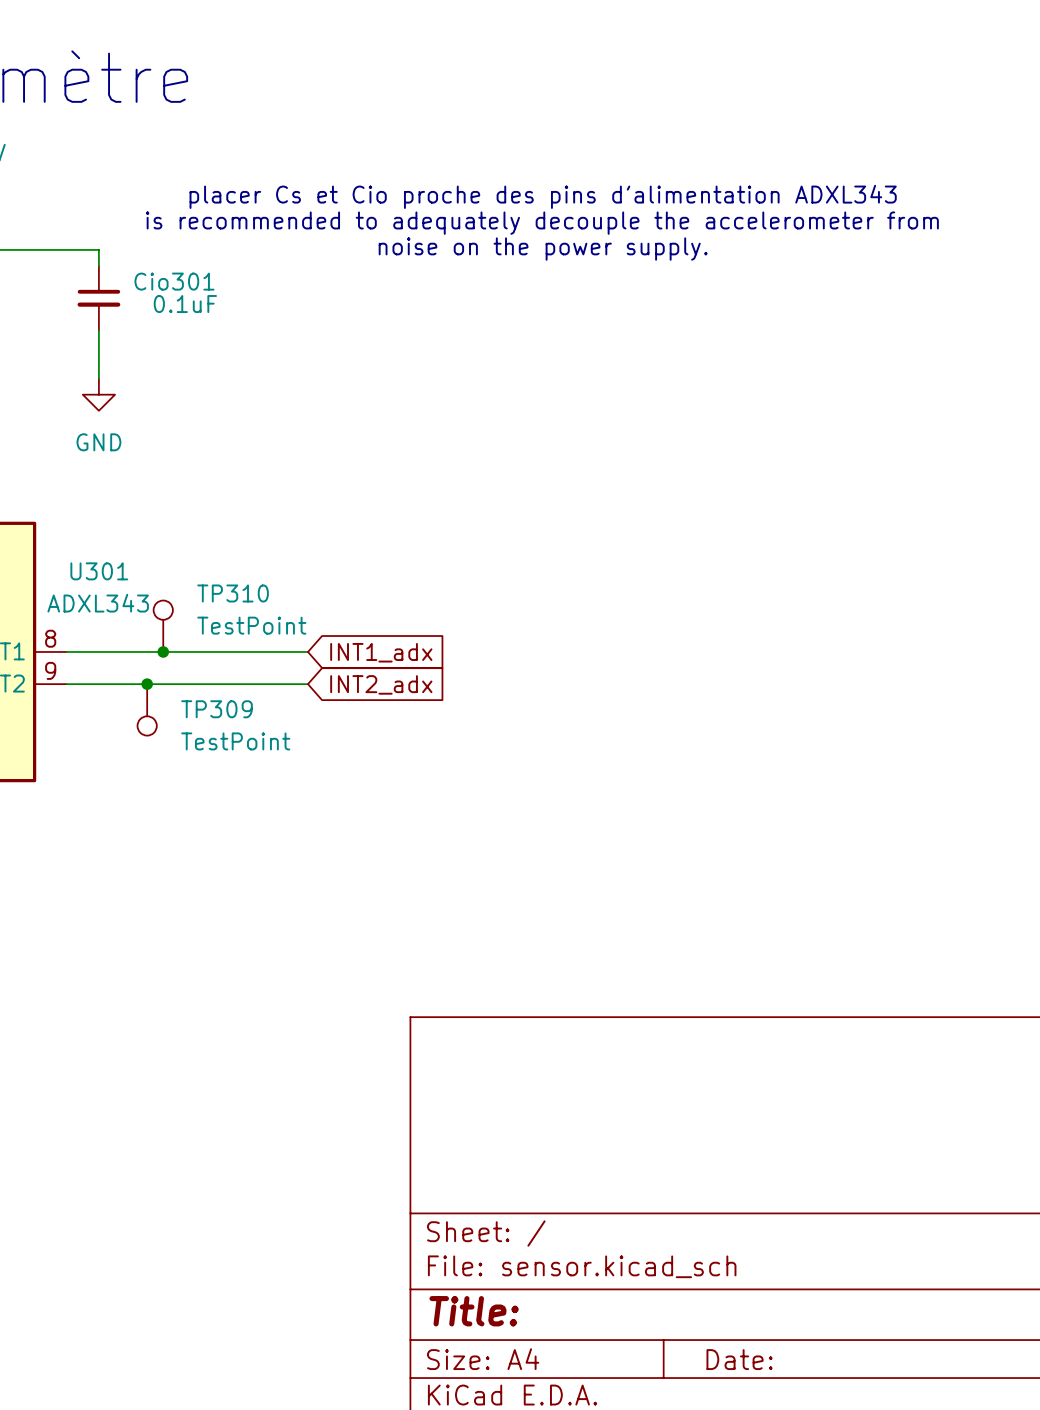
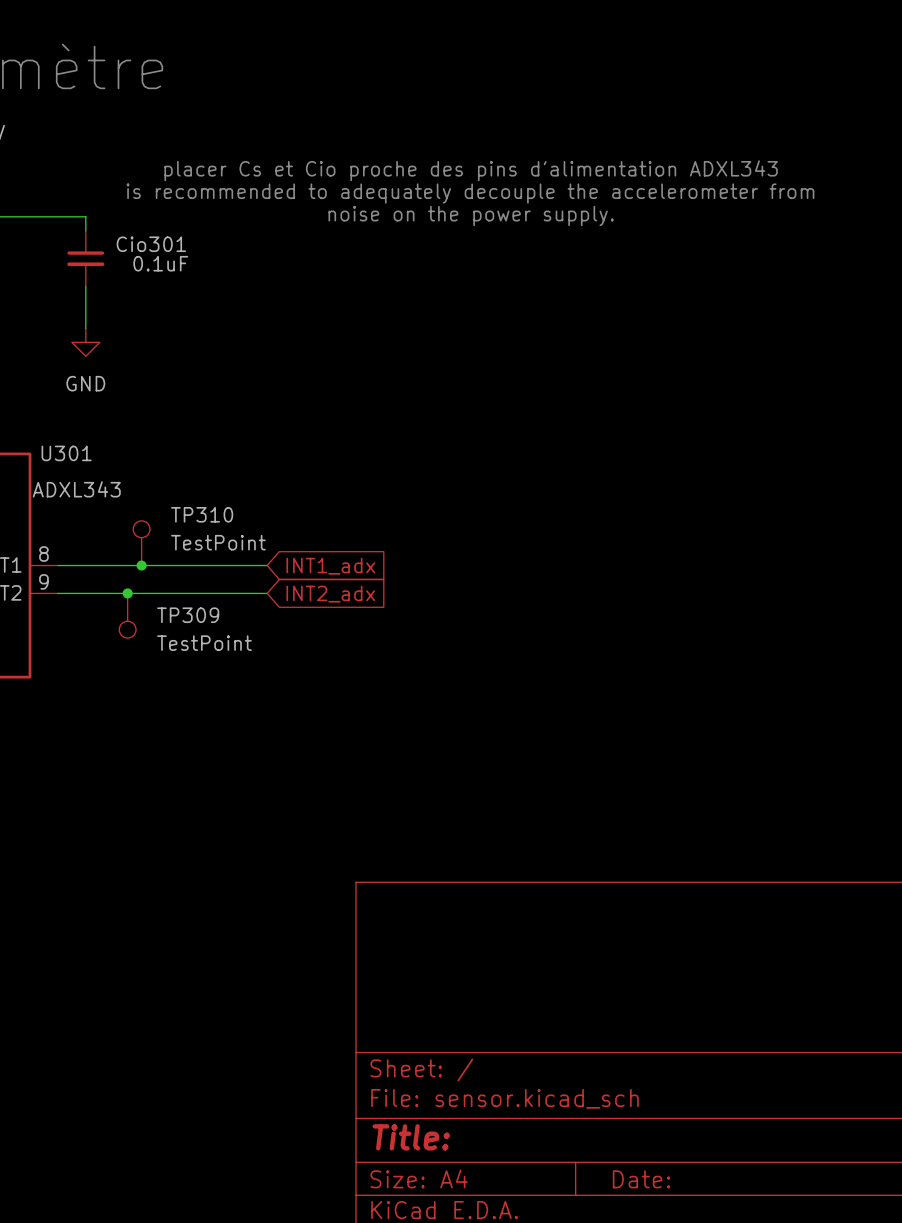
U301 name position: U301 (99, 571) -> U301 (66, 453)
U301 value position: ADXL343 (98, 603) -> ADXL343 (76, 489)

